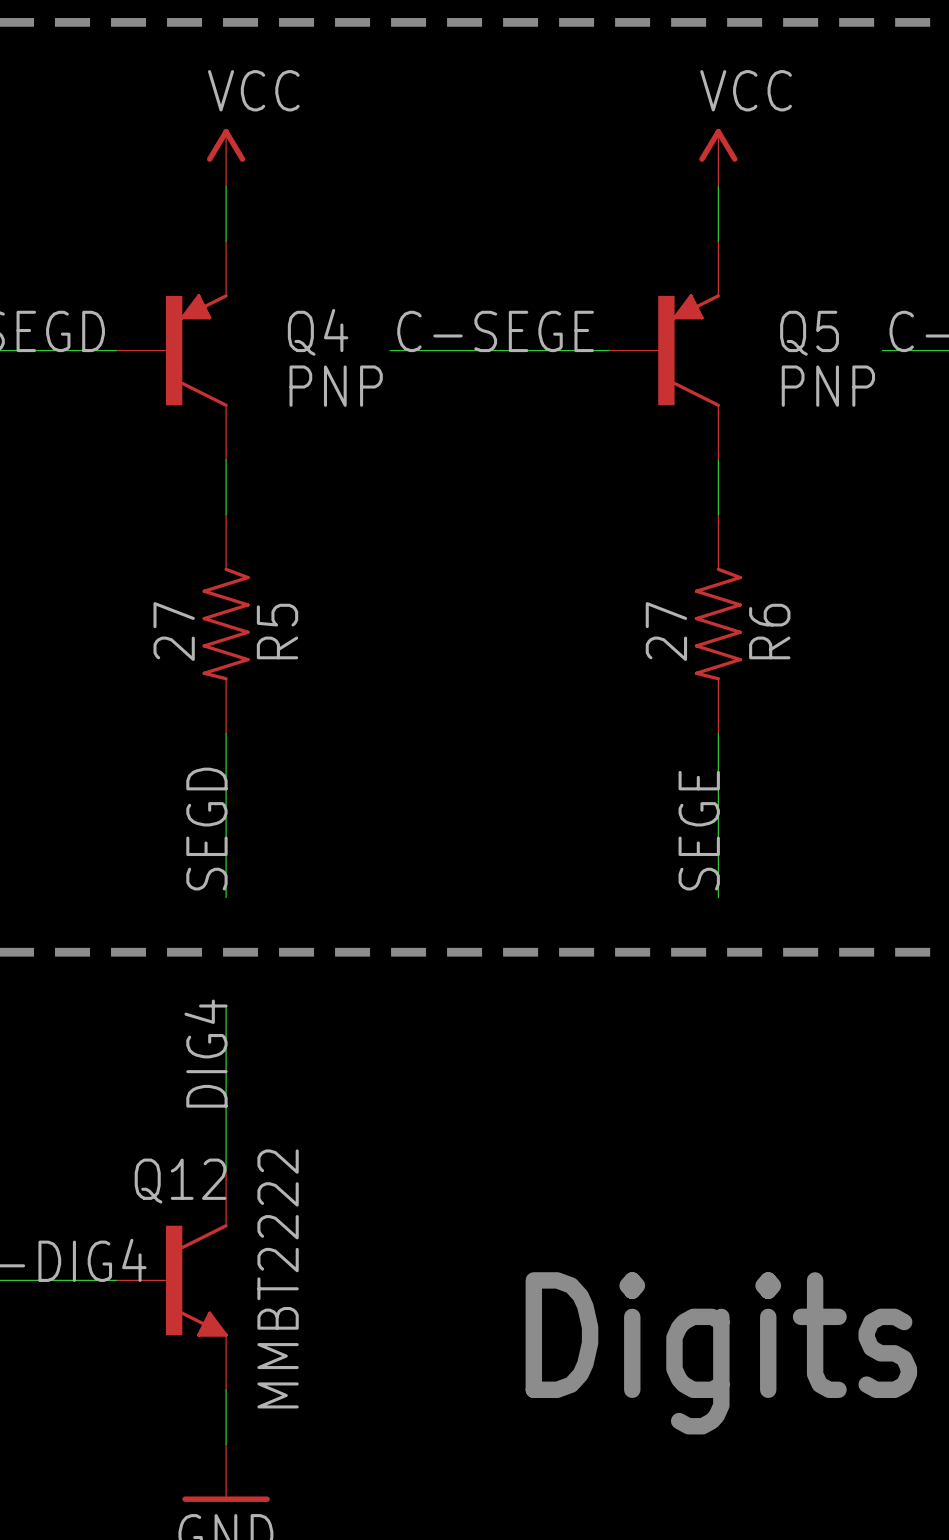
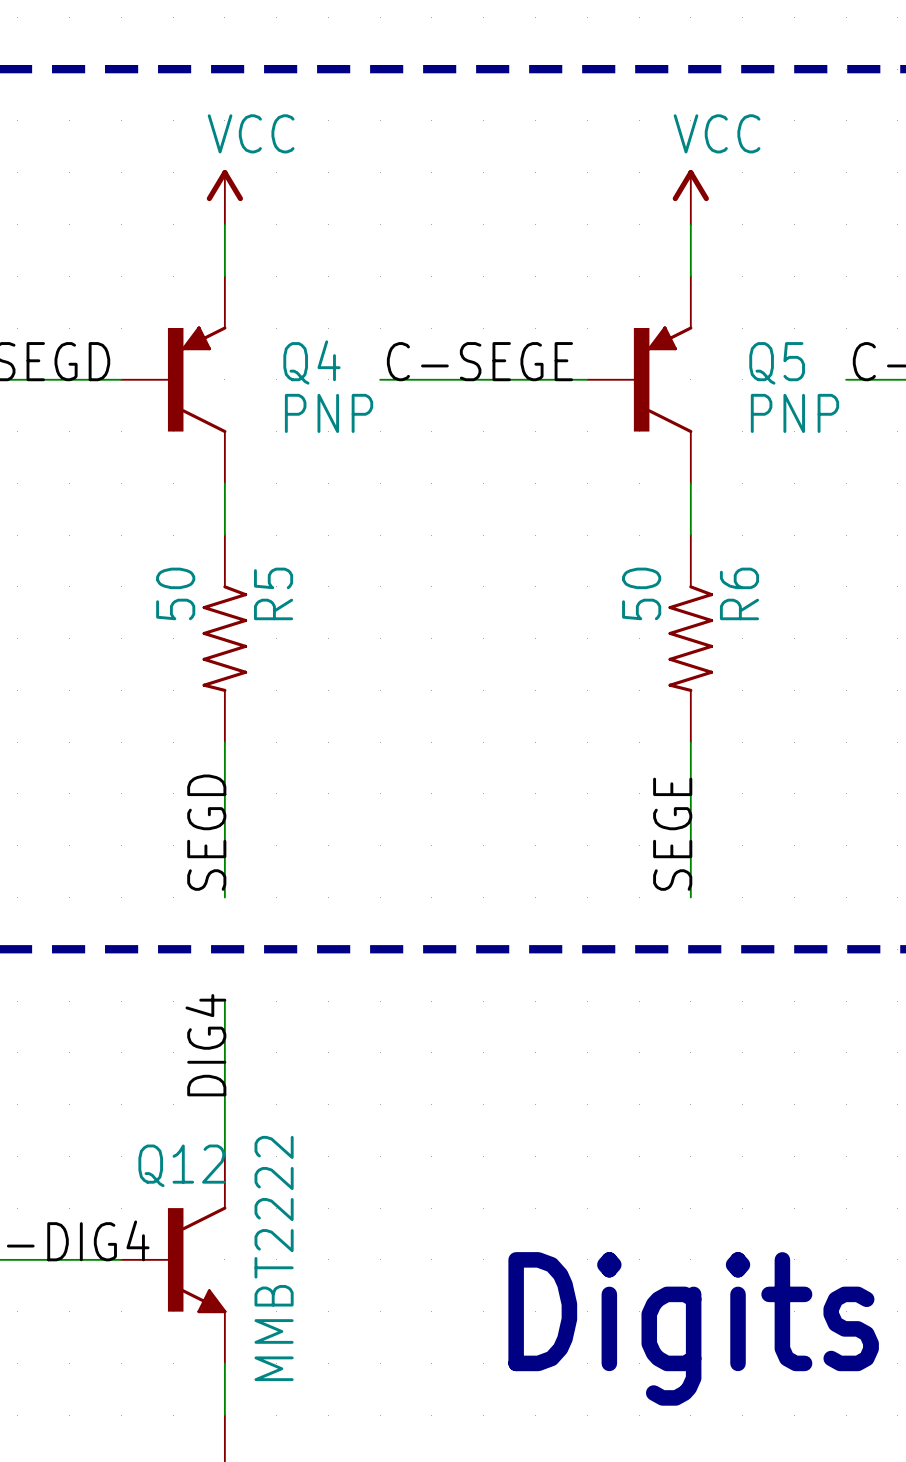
R5 value: 27 (174, 631) -> 50 (175, 593)
R5 name position: R5 (277, 631) -> R5 (273, 593)
R6 value: 27 (666, 631) -> 50 (641, 593)
R6 name position: R6 (769, 631) -> R6 (739, 593)

